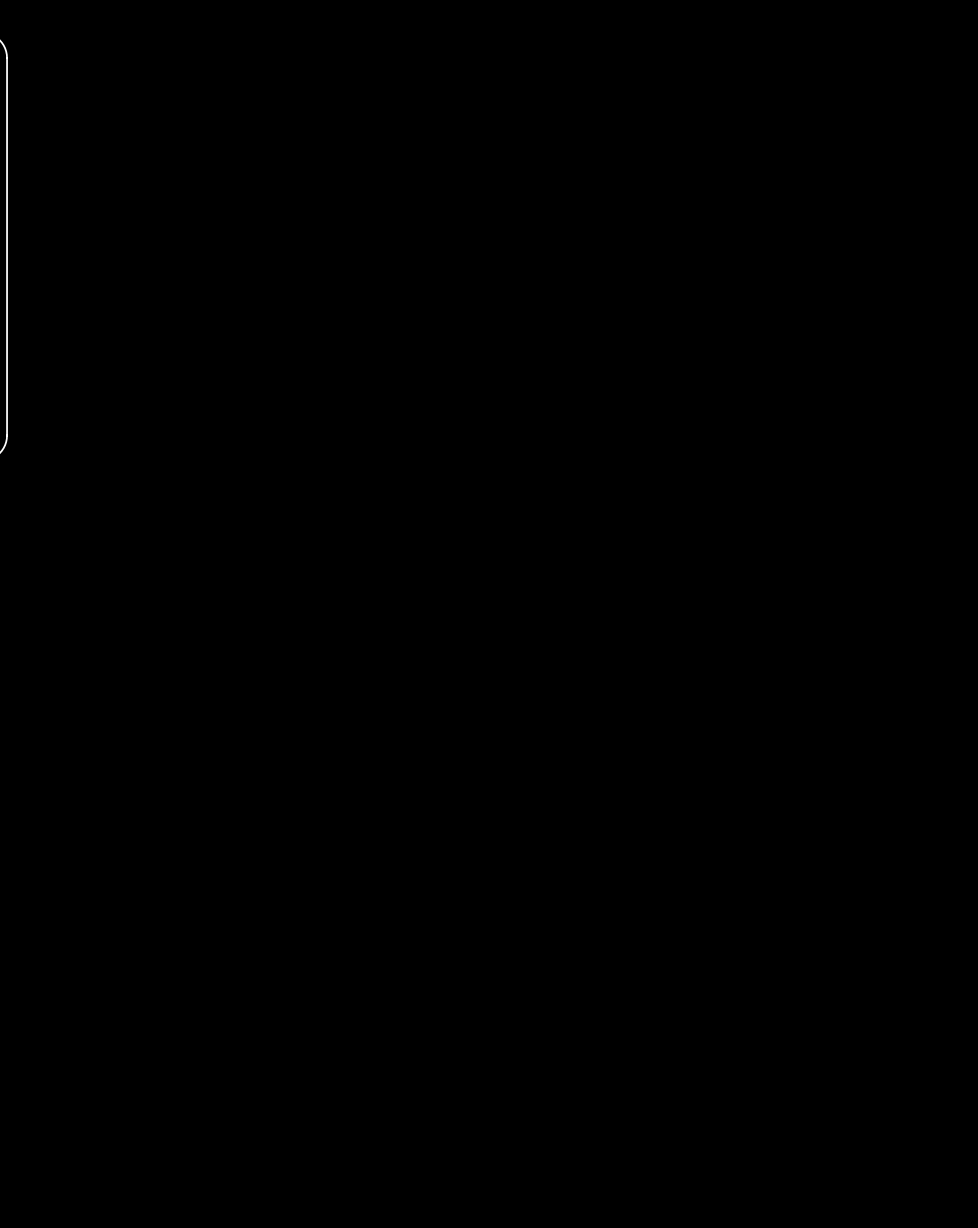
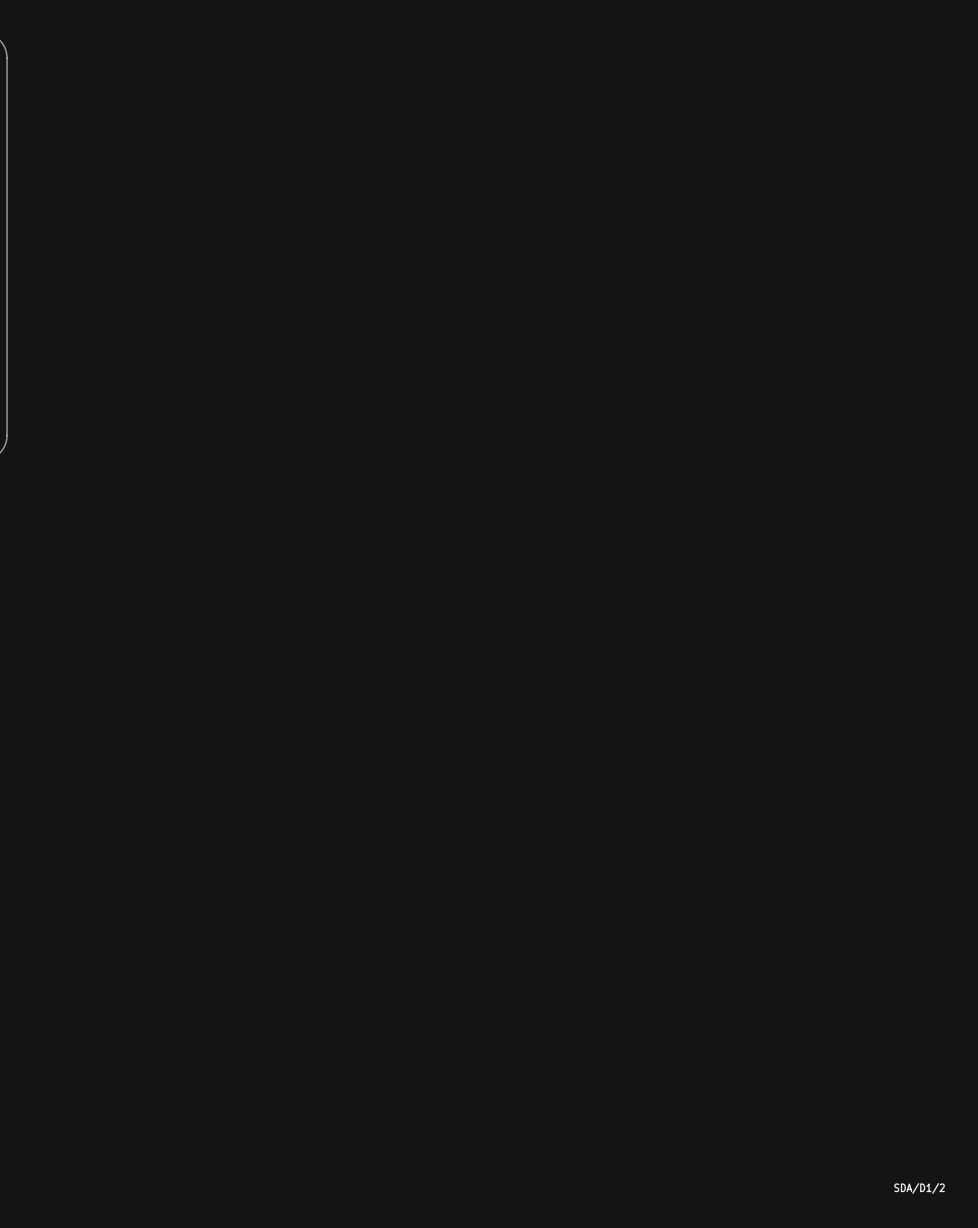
drawing: none -> [894, 1183, 945, 1194]

